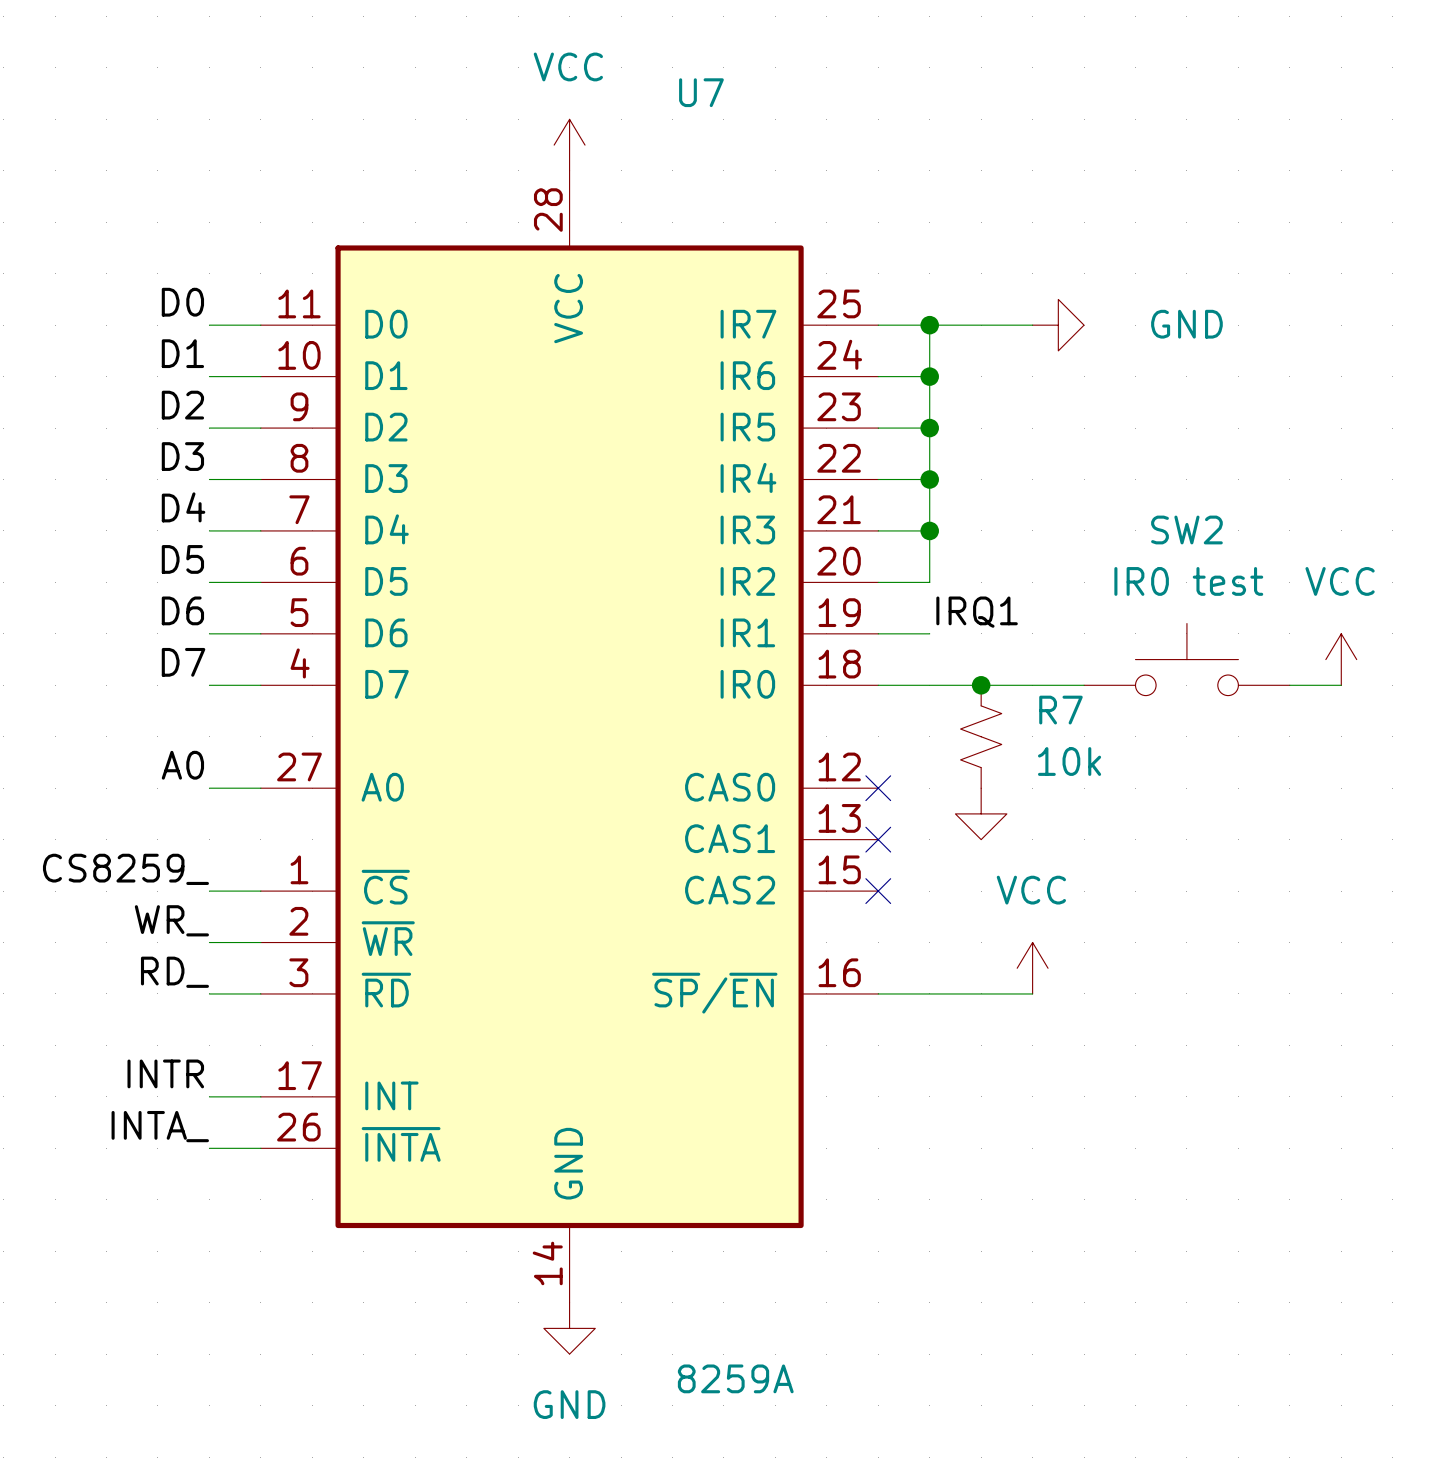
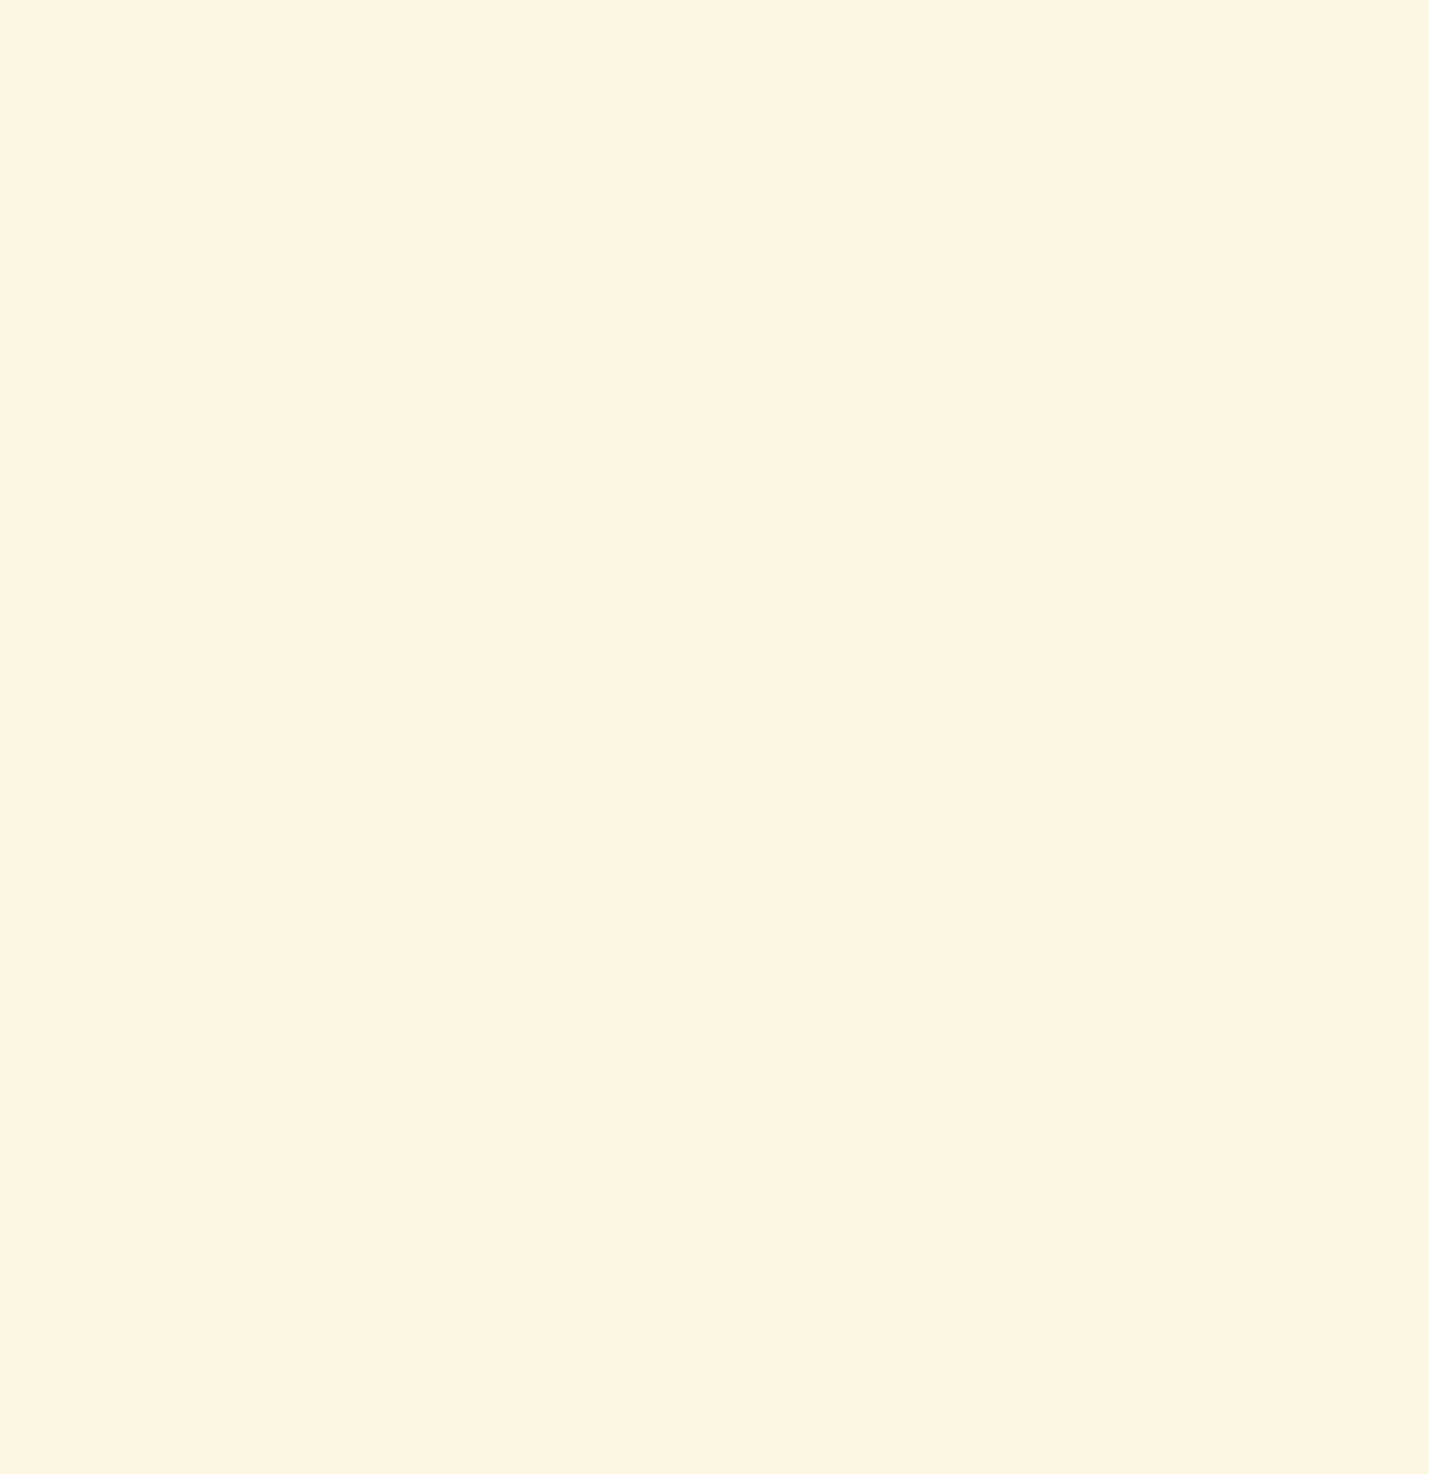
power symbol: VCC (569, 145) -> none
label: D0 (182, 302) -> none
wire: (209, 325) (260, 325) -> none
wire: (878, 325) (1032, 325) -> none
wire: (929, 325) (929, 582) (878, 582) -> none
junction: (929, 325) -> none
power symbol: GND (1058, 325) -> none
label: D1 (182, 353) -> none
wire: (209, 376) (260, 376) -> none
wire: (878, 376) (929, 376) -> none
junction: (929, 376) -> none
label: D2 (182, 405) -> none
wire: (209, 428) (260, 428) -> none
wire: (878, 428) (929, 428) -> none
junction: (929, 428) -> none
label: D3 (182, 456) -> none
wire: (209, 479) (260, 479) -> none
wire: (878, 479) (929, 479) -> none
junction: (929, 479) -> none
label: D4 (183, 507) -> none
wire: (209, 530) (260, 530) -> none
wire: (878, 530) (929, 530) -> none
junction: (929, 530) -> none
label: D5 (182, 559) -> none
wire: (209, 582) (260, 582) -> none
label: D6 (182, 610) -> none
label: IRQ1 (977, 612) -> none
wire: (209, 633) (260, 633) -> none
wire: (878, 633) (929, 633) -> none
SW2: IR0 test (1186, 659) -> none
power symbol: VCC (1341, 659) -> none
label: D7 (183, 662) -> none
wire: (209, 685) (260, 685) -> none
wire: (878, 685) (1084, 685) -> none
junction: (981, 685) -> none
wire: (1289, 685) (1341, 685) -> none
U7: 8259A (569, 736) -> none
R7: 10k (981, 736) -> none
label: A0 (182, 765) -> none
wire: (209, 788) (260, 788) -> none
no-connect mark: (878, 788) -> none
power symbol: (981, 813) -> none
no-connect mark: (878, 839) -> none
label: CS8259_ (125, 869) -> none
wire: (209, 891) (260, 891) -> none
no-connect mark: (878, 891) -> none
label: WR_ (171, 920) -> none
wire: (209, 942) (260, 942) -> none
power symbol: VCC (1032, 968) -> none
label: RD_ (174, 972) -> none
wire: (209, 993) (260, 993) -> none
wire: (878, 993) (1032, 993) -> none
label: INTR (165, 1073) -> none
wire: (209, 1096) (260, 1096) -> none
label: INTA_ (160, 1126) -> none
wire: (209, 1148) (260, 1148) -> none
power symbol: GND (569, 1328) -> none

